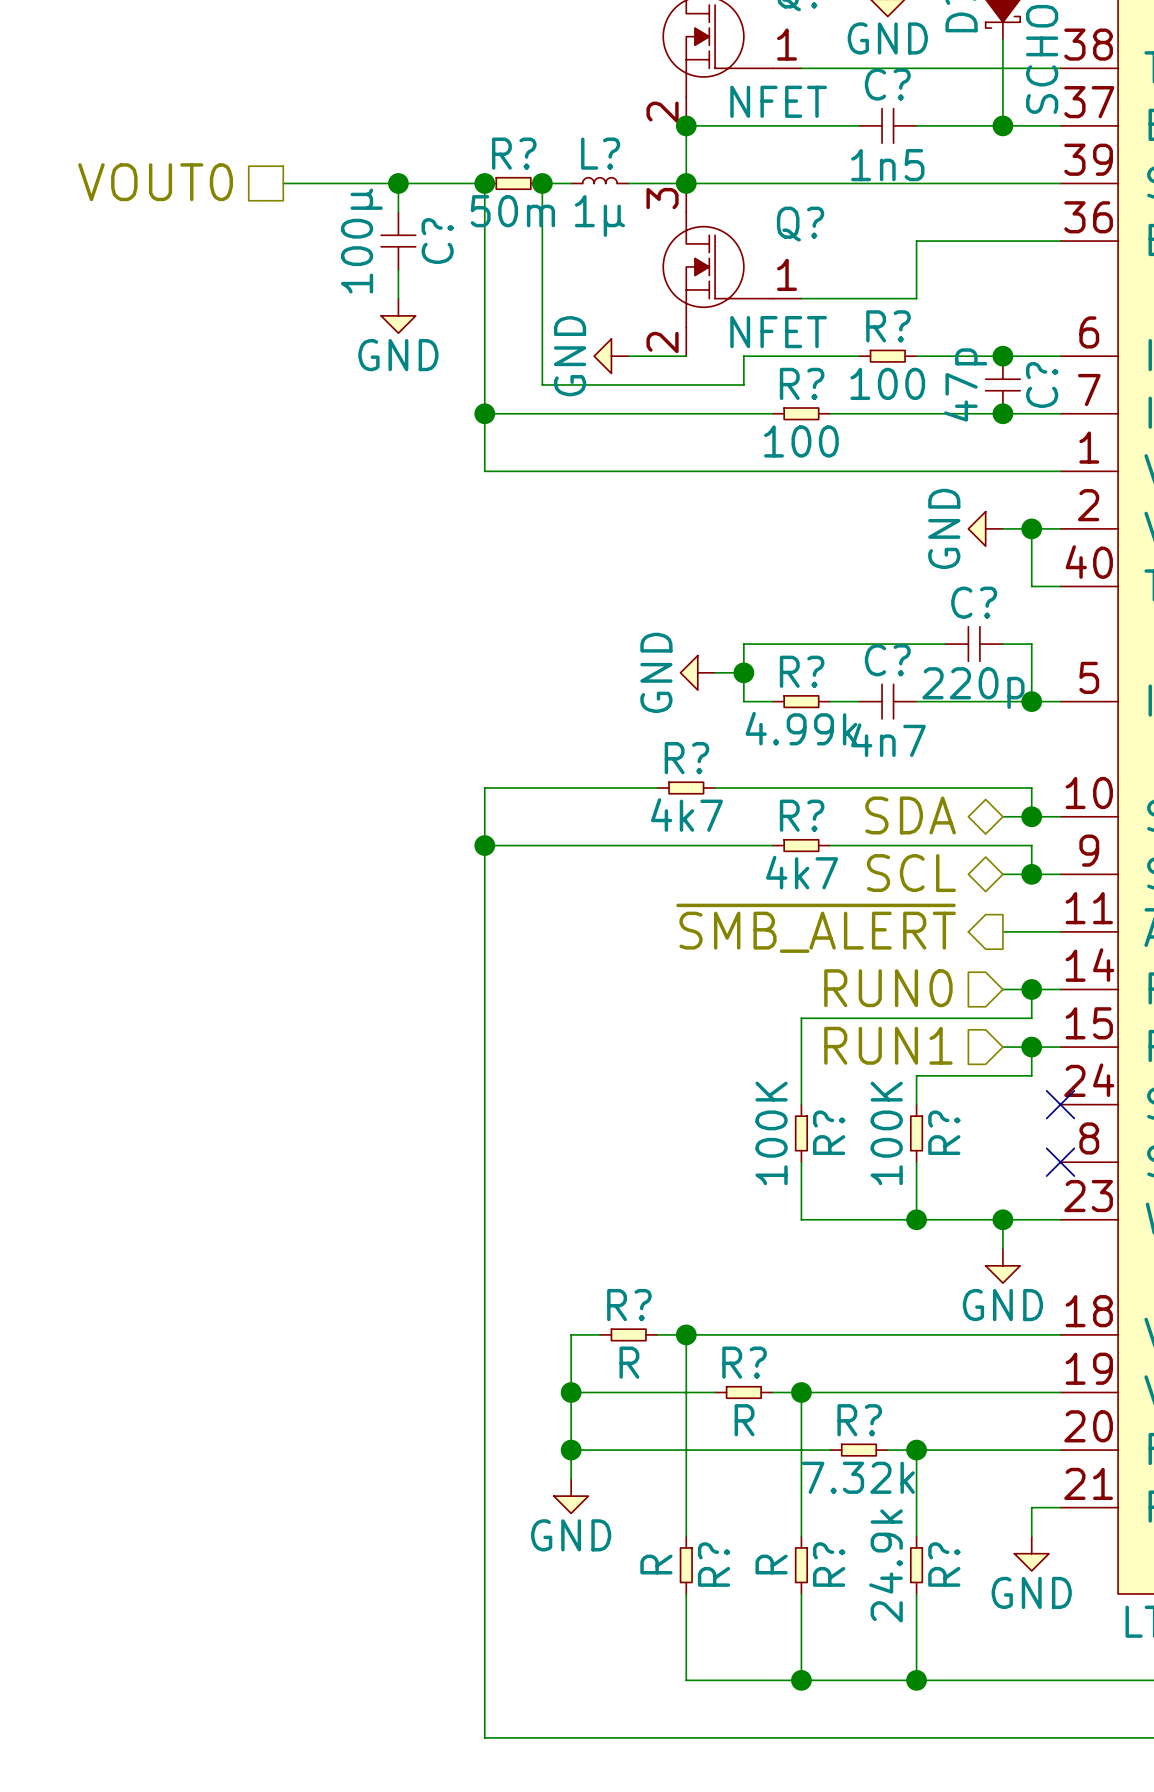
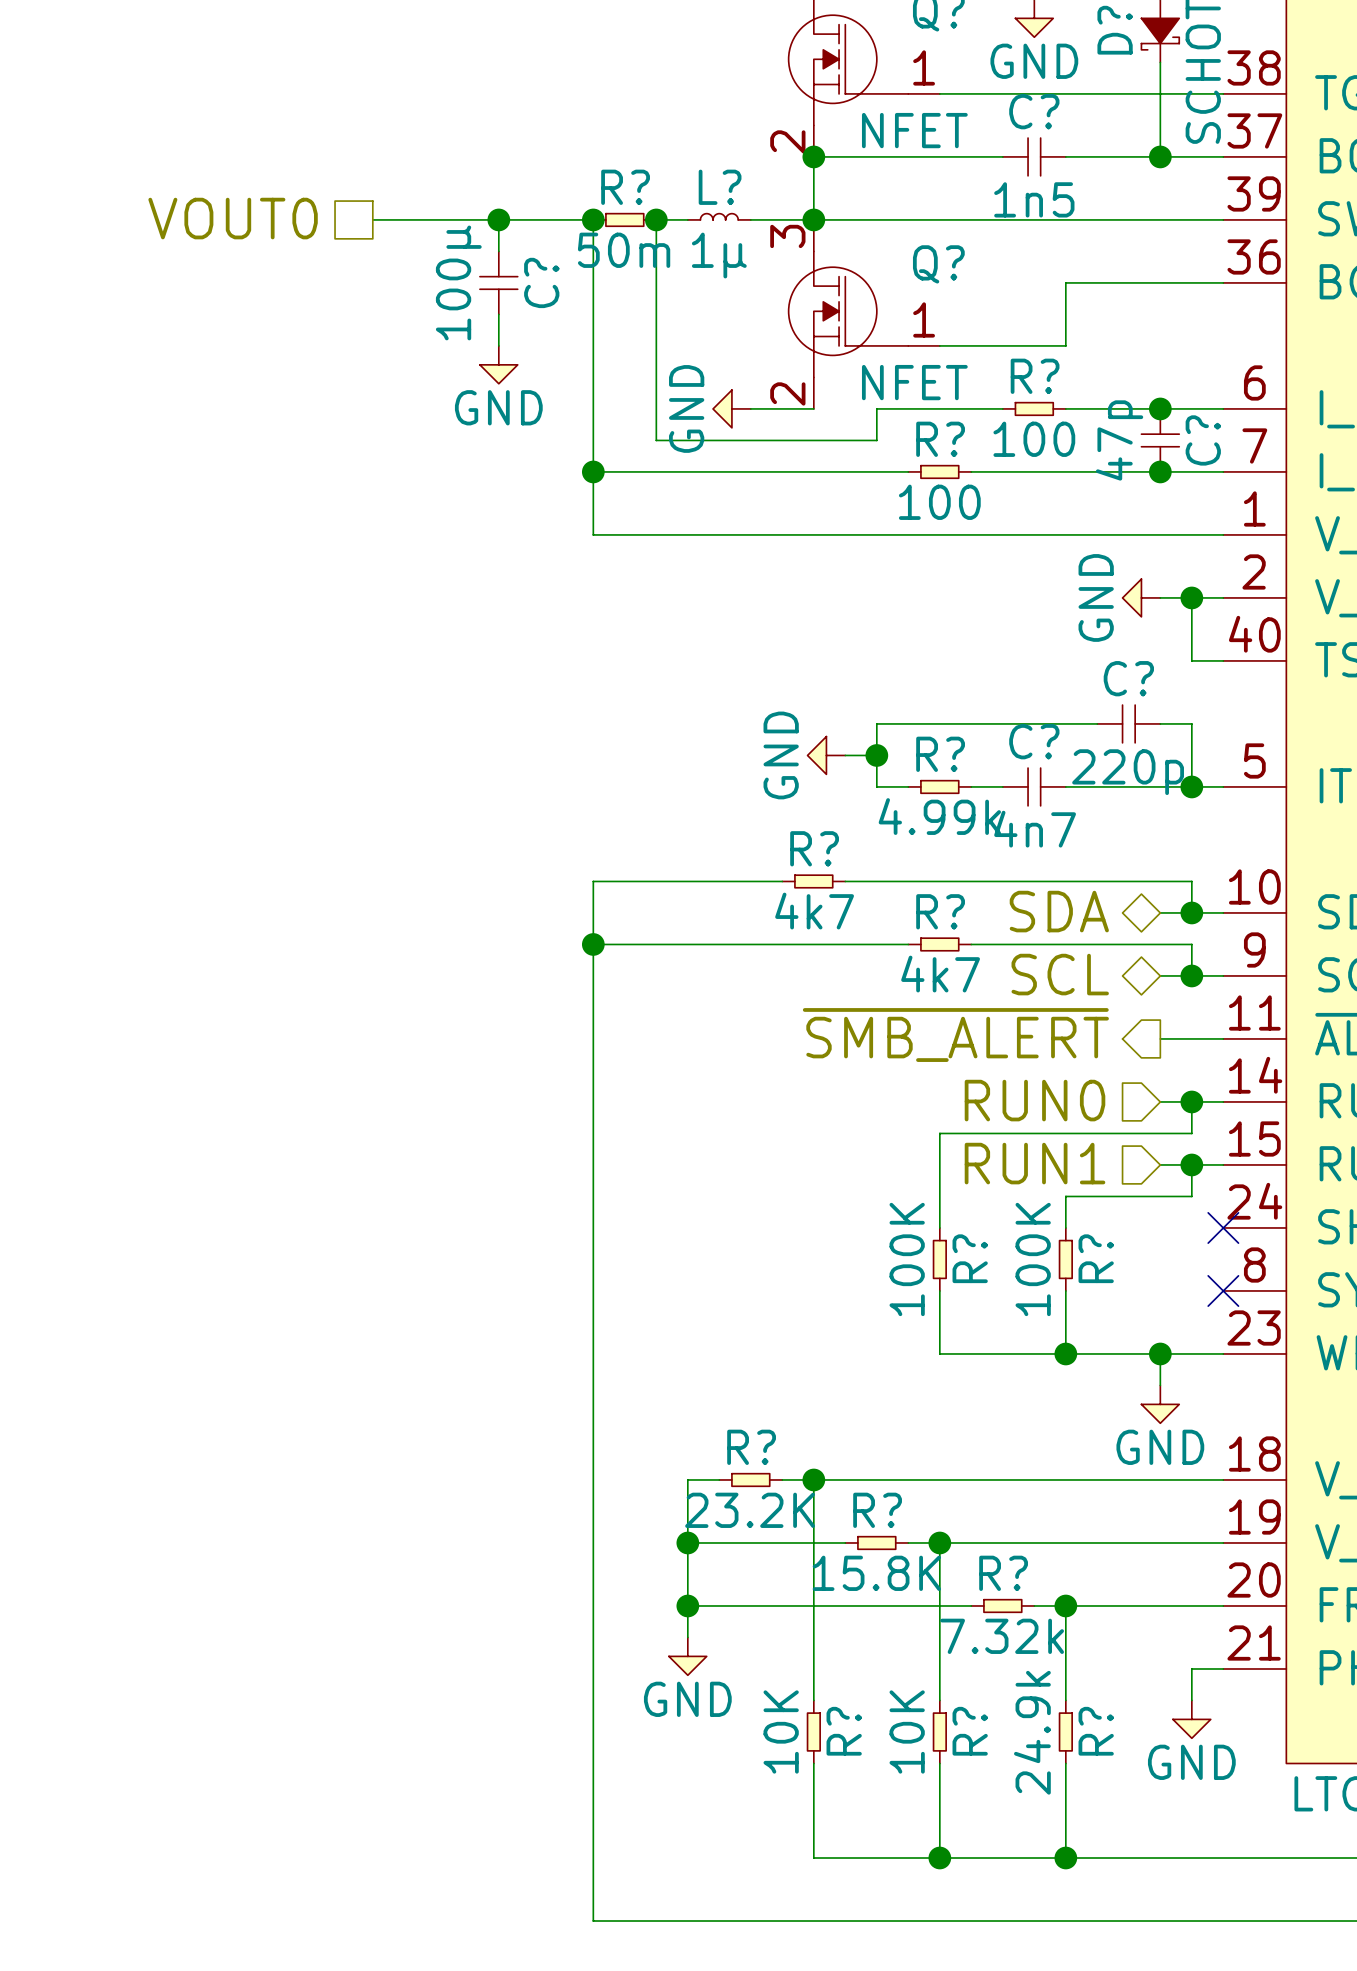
R? value: R (629, 1362) -> 23.2K (750, 1510)
R? value: R (744, 1420) -> 15.8K (876, 1573)
R? value: R (656, 1564) -> 10K (781, 1731)
R? value: R (771, 1564) -> 10K (907, 1731)

